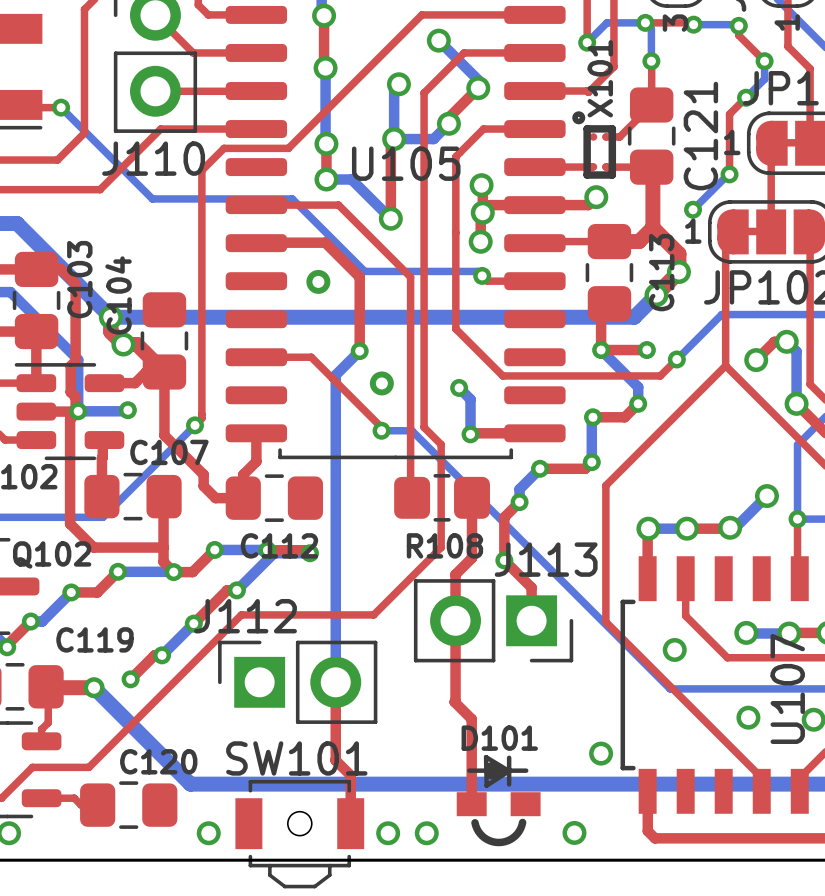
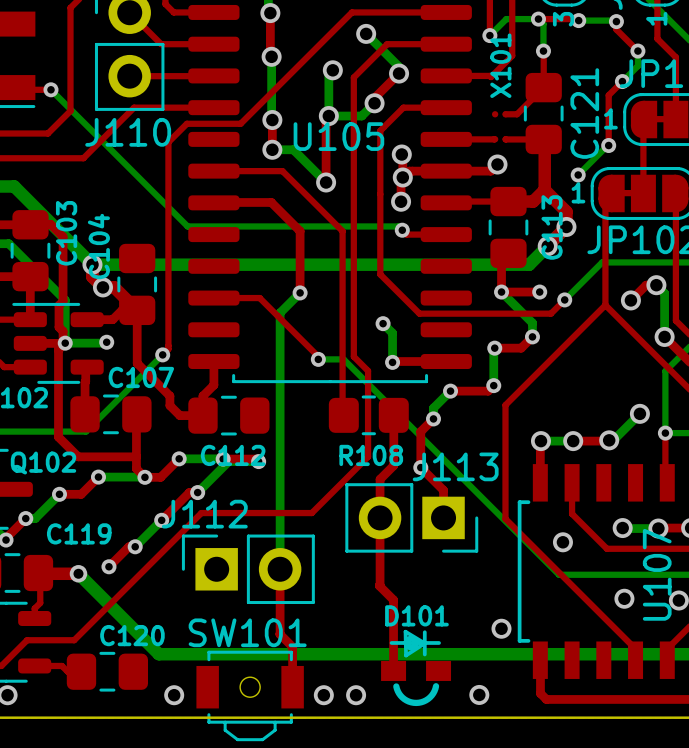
X101 footprint: [572, 111, 617, 179] -> [486, 103, 509, 143]
bottom track: (152, 198) (292, 198) (364, 271) -> (127, 166) (187, 226) (304, 226)
via: (318, 281) -> none
via: (381, 383) -> none

